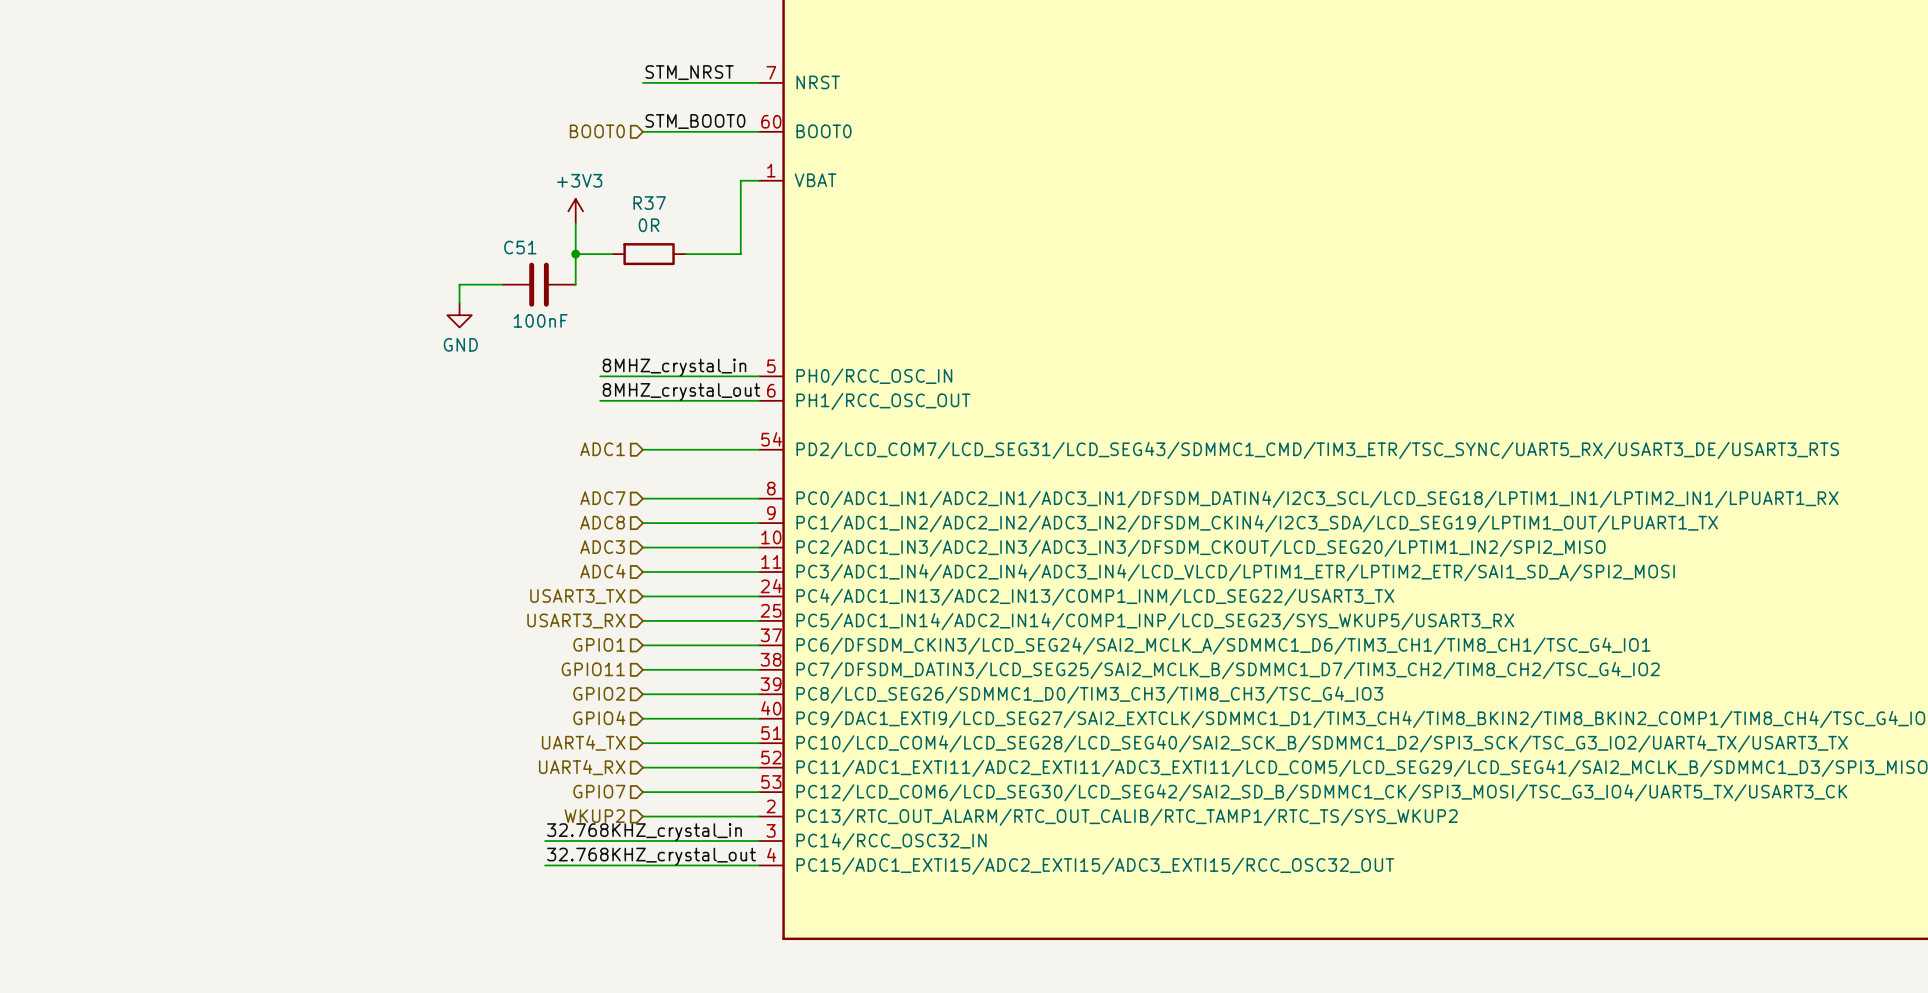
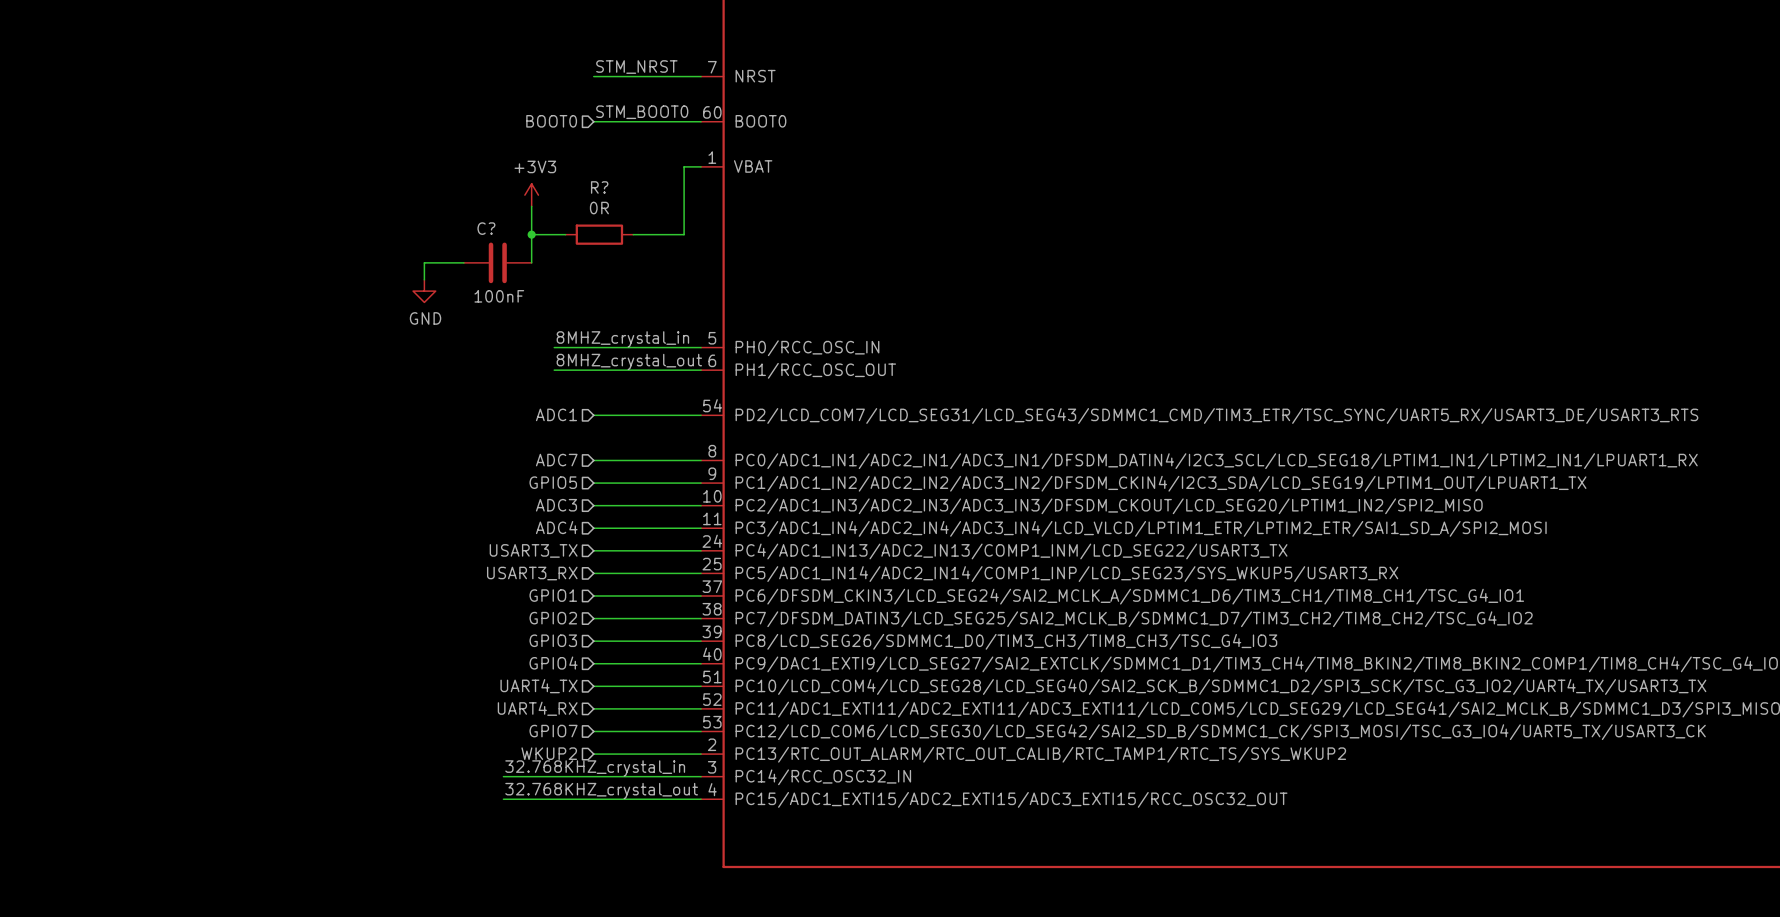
R37 name: R37 (649, 203) -> R? (599, 187)
C51 name: C51 (520, 247) -> C? (486, 228)
hierarchical label: ADC8 (602, 522) -> GPIO5 (553, 482)
hierarchical label: GPIO11 (593, 669) -> GPIO2 (553, 618)
hierarchical label: GPIO2 (599, 693) -> GPIO3 (553, 640)

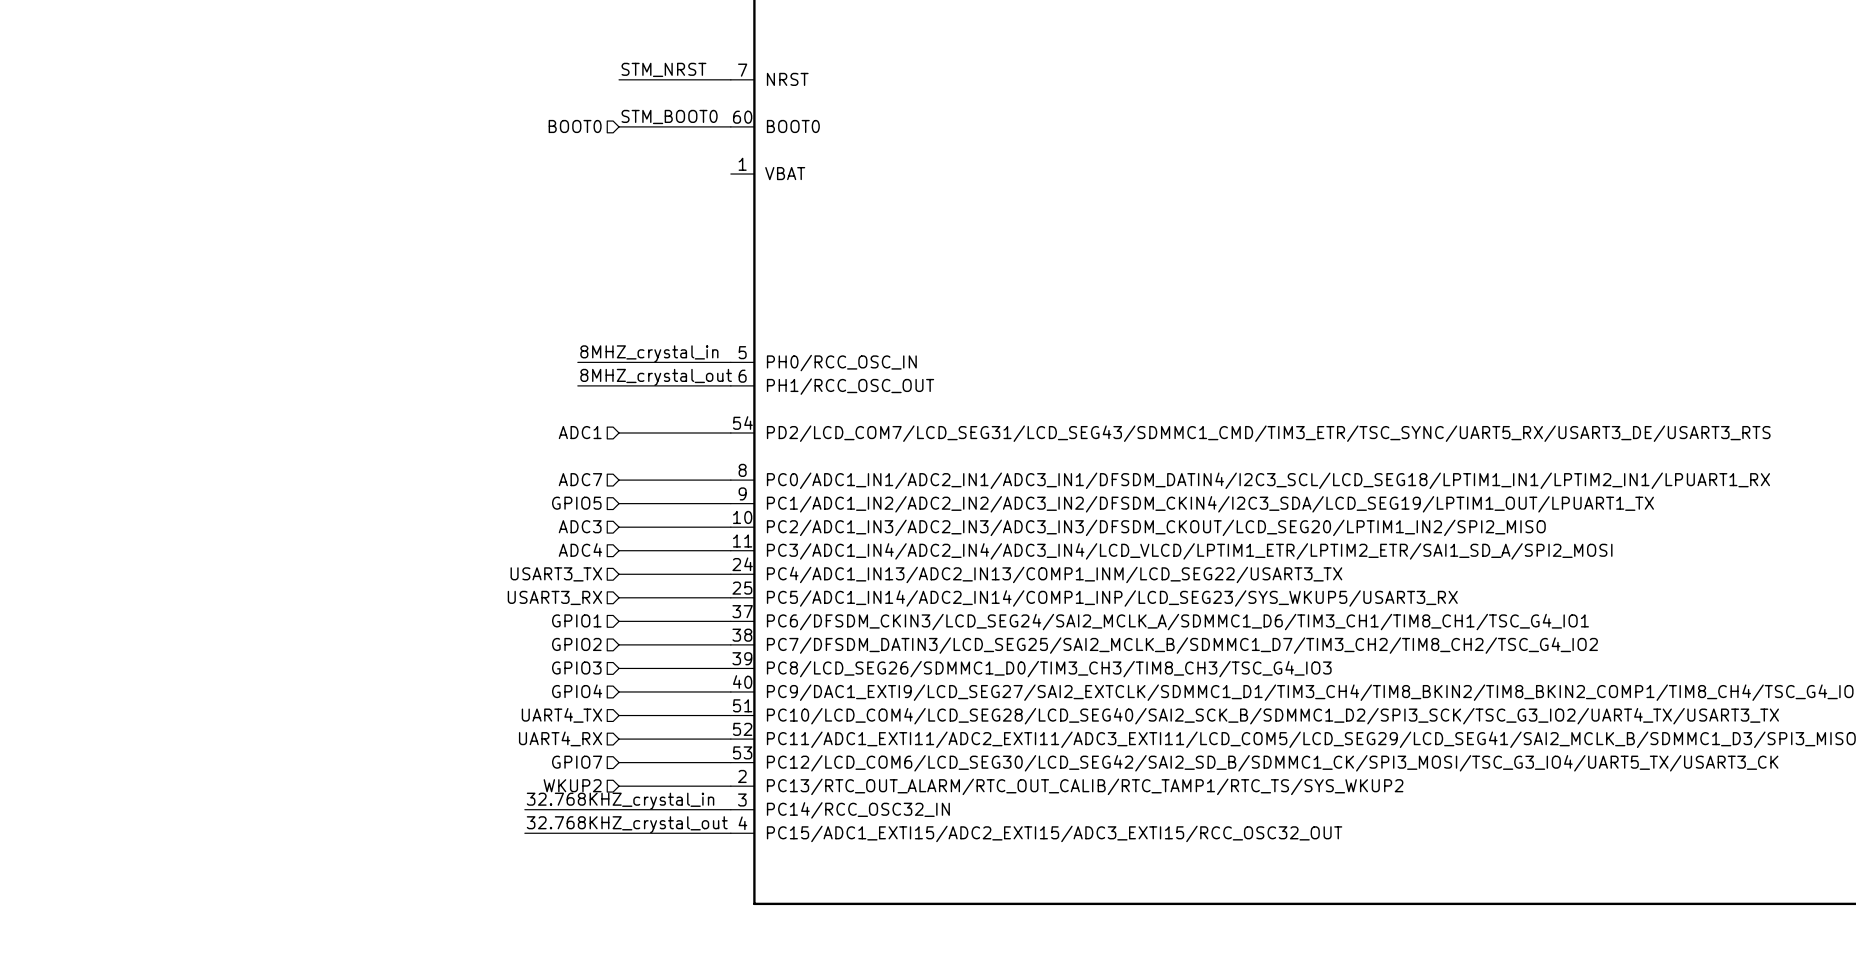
wire: (701, 166) (684, 166) (684, 234) (633, 234) -> none
power symbol: +3V3 (531, 195) -> none
wire: (531, 206) (531, 262) -> none
wire: (531, 234) (565, 234) -> none
junction: (531, 234) -> none
R?: 0R (599, 234) -> none
wire: (463, 262) (424, 262) (424, 279) -> none
C?: 100nF (497, 262) -> none
power symbol: GND (424, 291) -> none

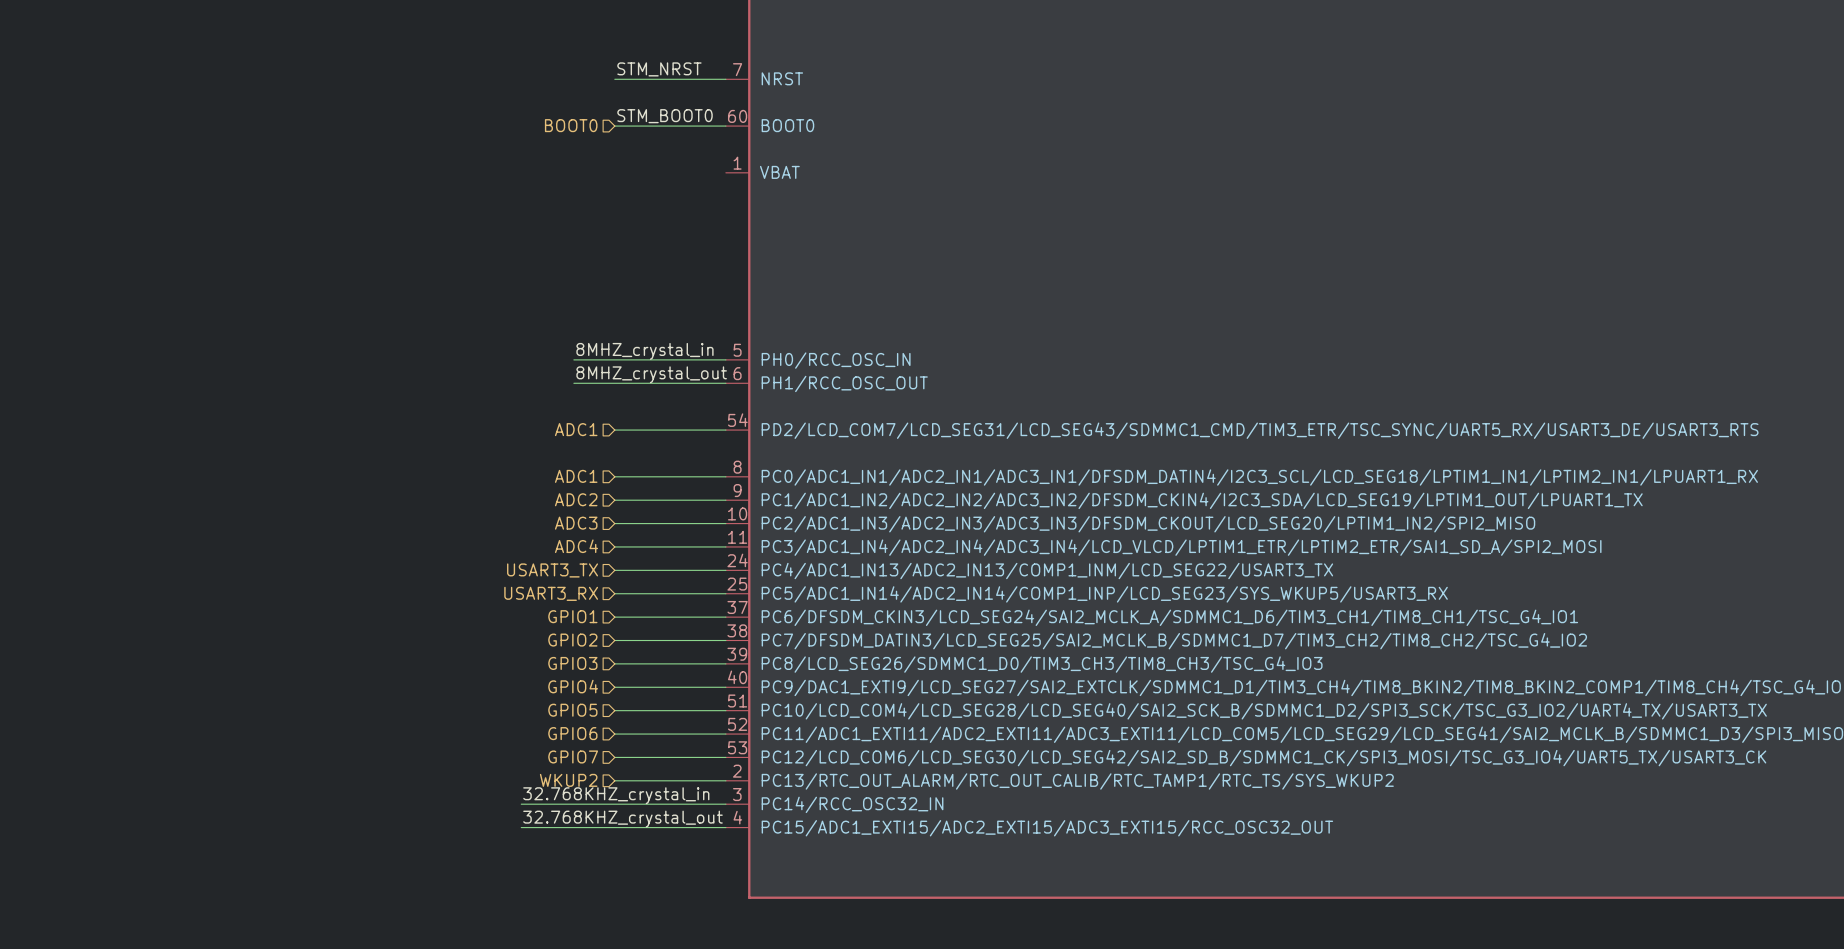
hierarchical label: ADC7 (580, 479) -> ADC1 (576, 476)
hierarchical label: GPIO5 (576, 503) -> ADC2 (576, 499)
hierarchical label: UART4_TX (561, 715) -> GPIO5 (572, 710)
hierarchical label: UART4_RX (560, 738) -> GPIO6 (572, 733)

